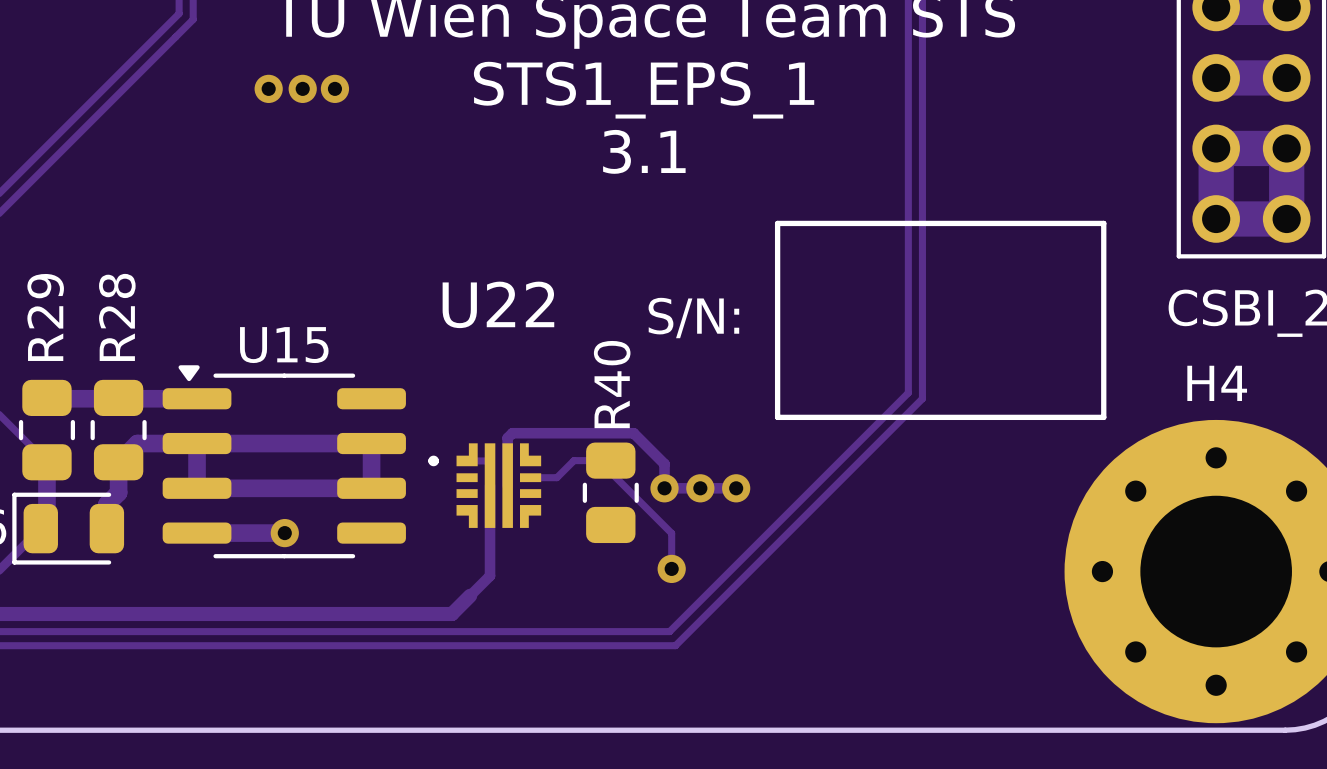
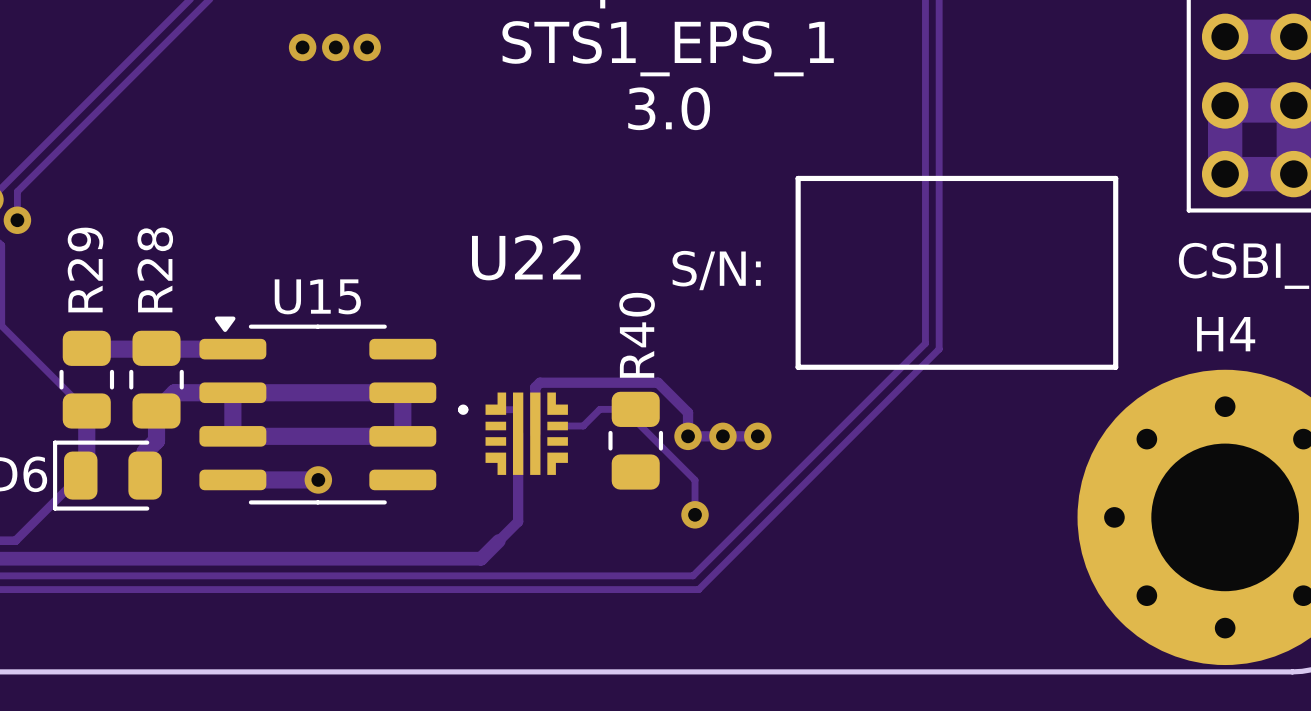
text: 3.1 (644, 151) -> 3.0 (669, 108)

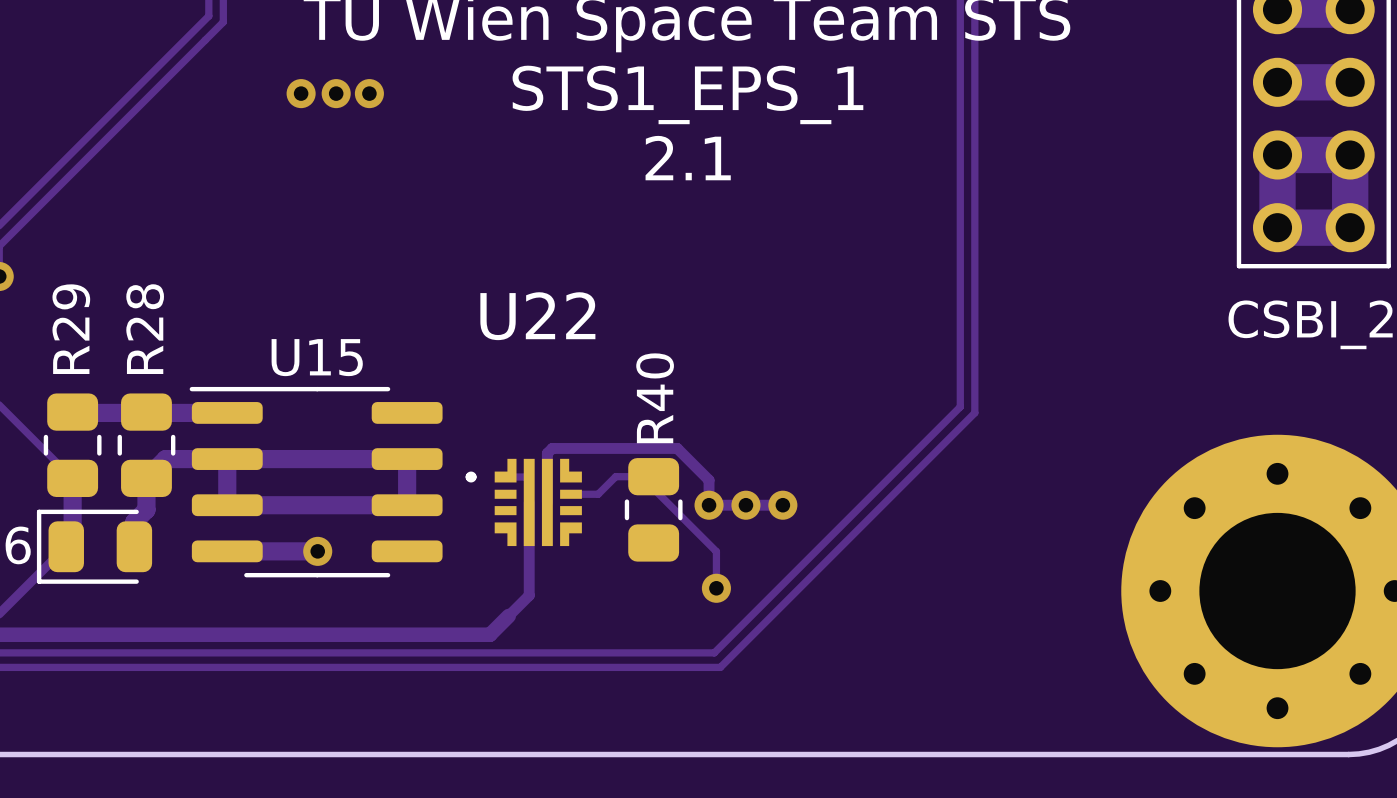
text: 3.0 (669, 108) -> 2.1 (688, 158)
line: (798, 178) (1115, 178) (1115, 367) (798, 367) (798, 178) -> none
text: S/N: (716, 270) -> none
U15 footprint: [199, 316, 437, 505] -> [189, 386, 443, 578]
H4 name: H4 (1226, 334) -> none

